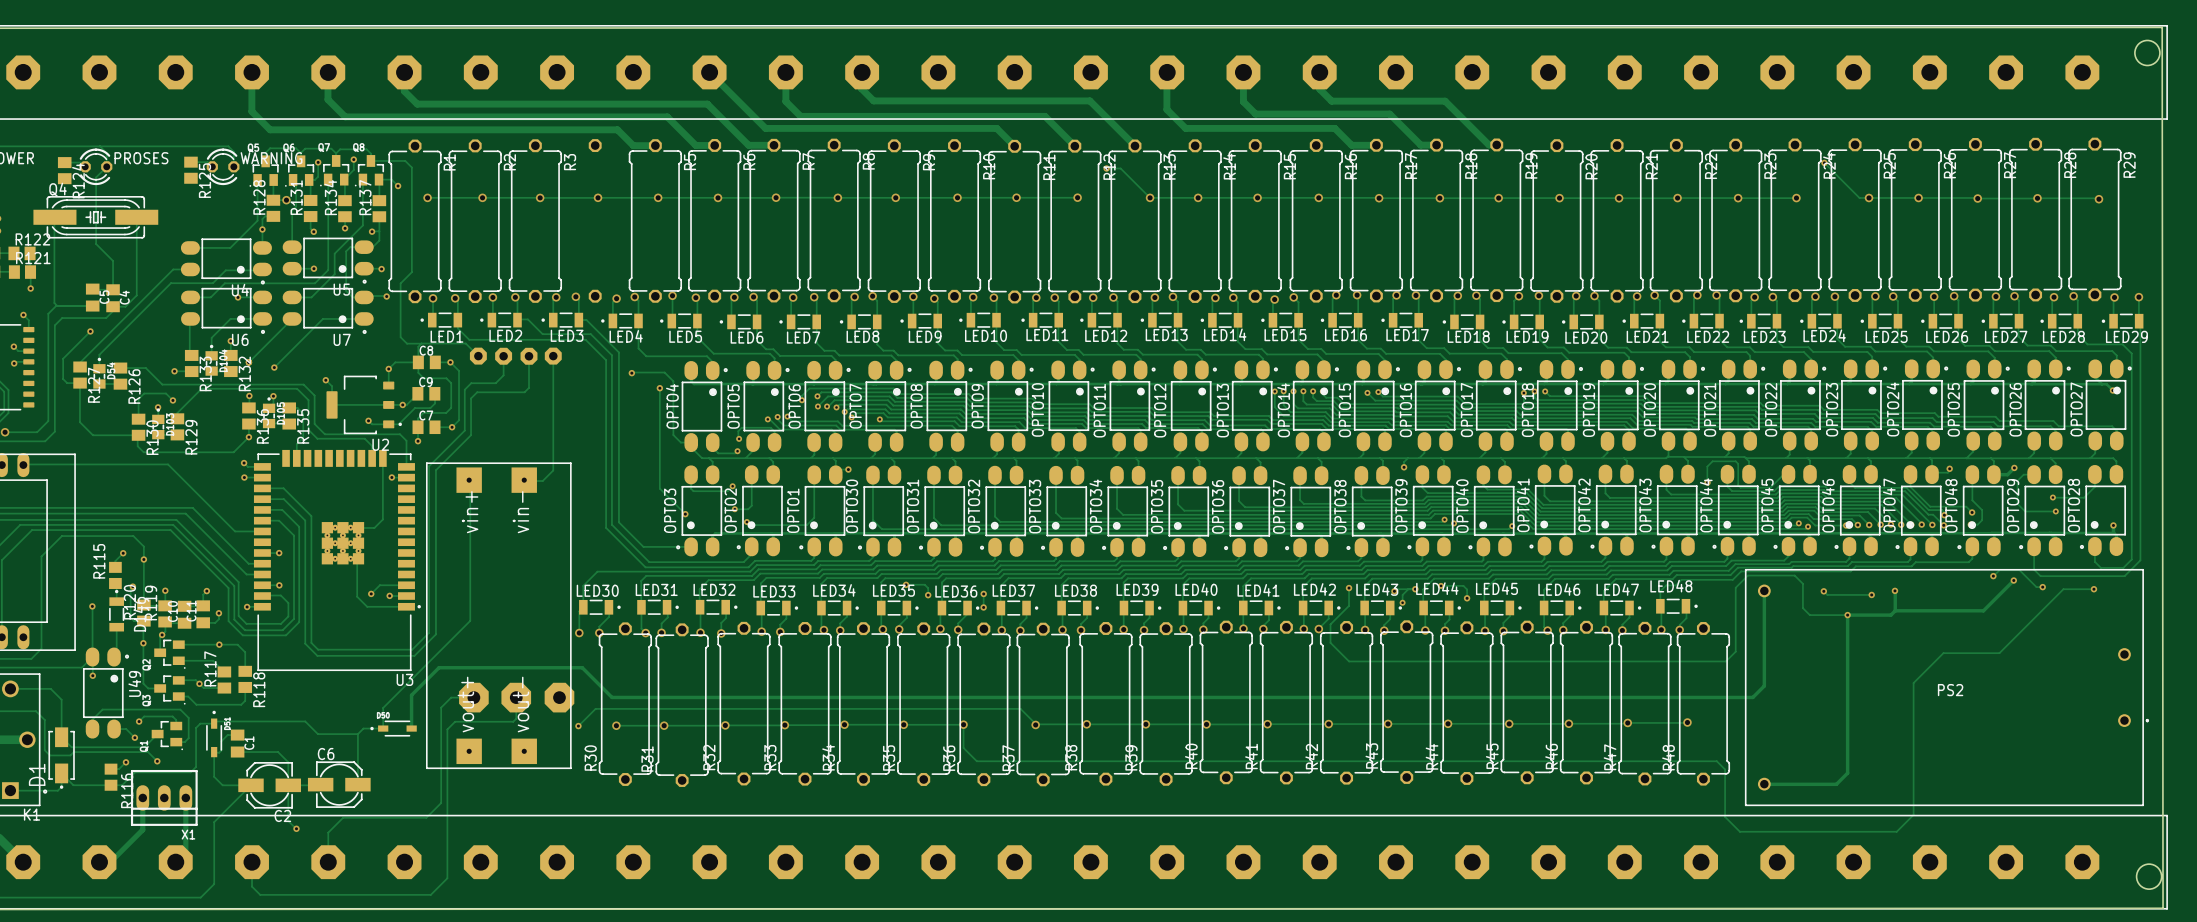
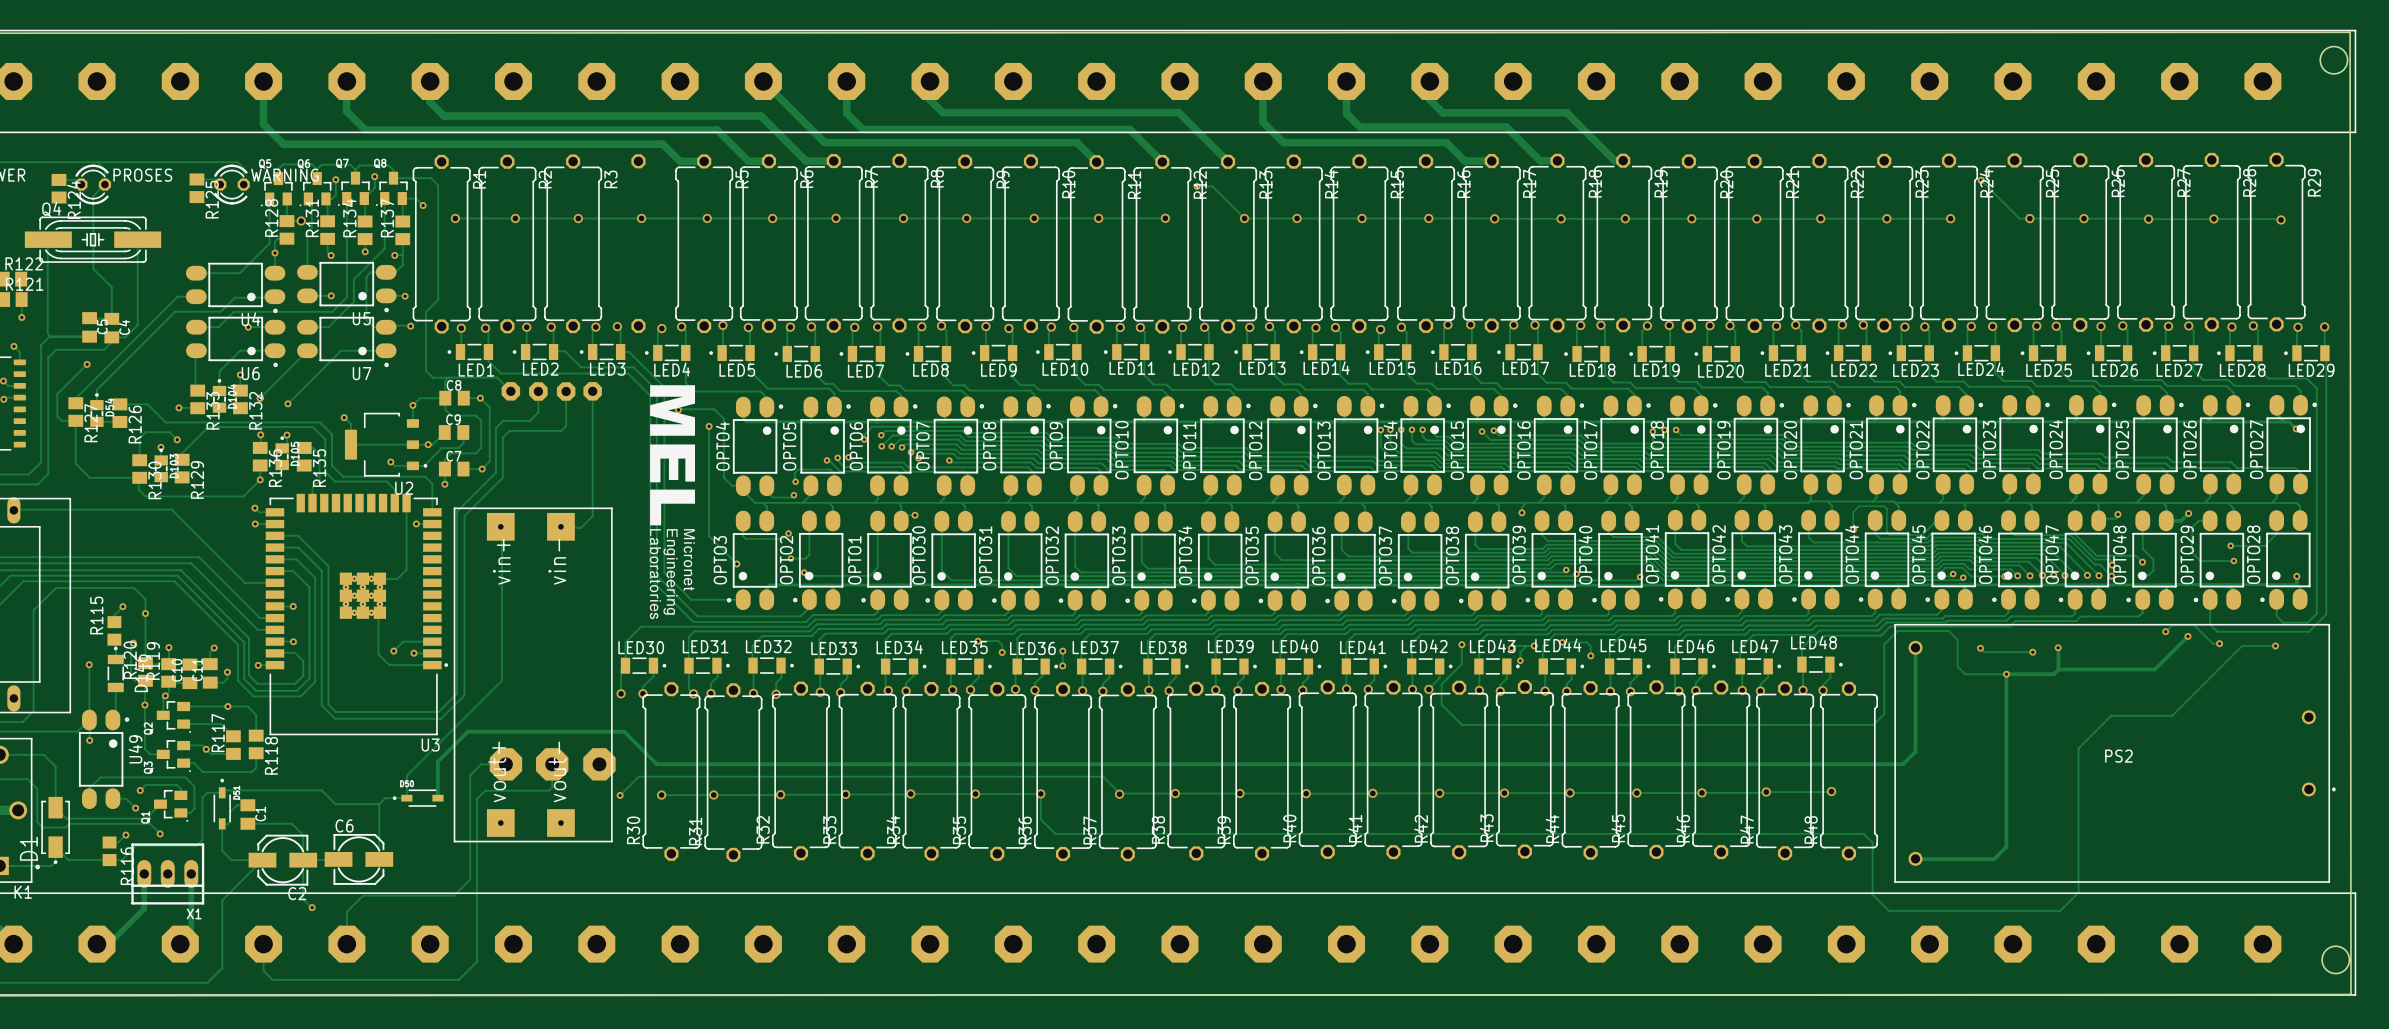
drawing: none -> [649, 385, 696, 620]

